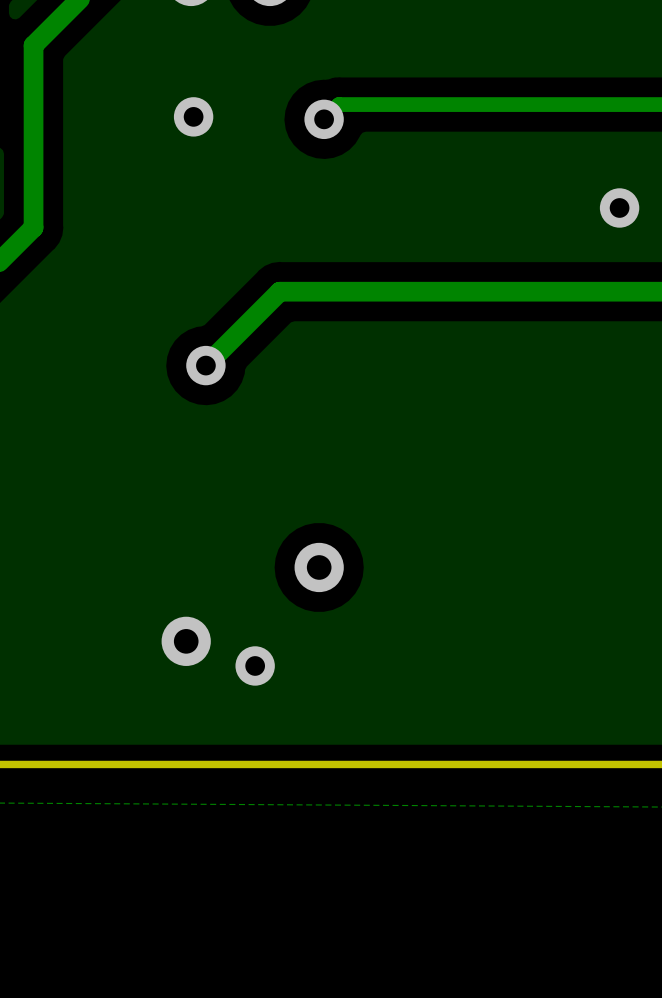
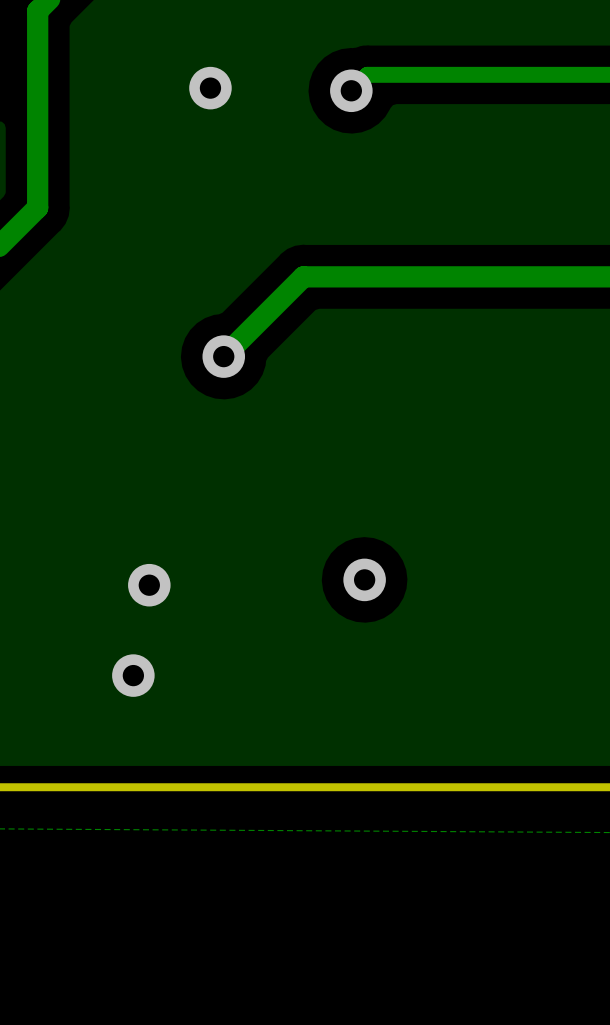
via size: [294, 542, 344, 593] -> [343, 558, 386, 602]
via: none -> (149, 585)
via: (186, 641) -> none
via: none -> (133, 675)
via: (255, 665) -> none

